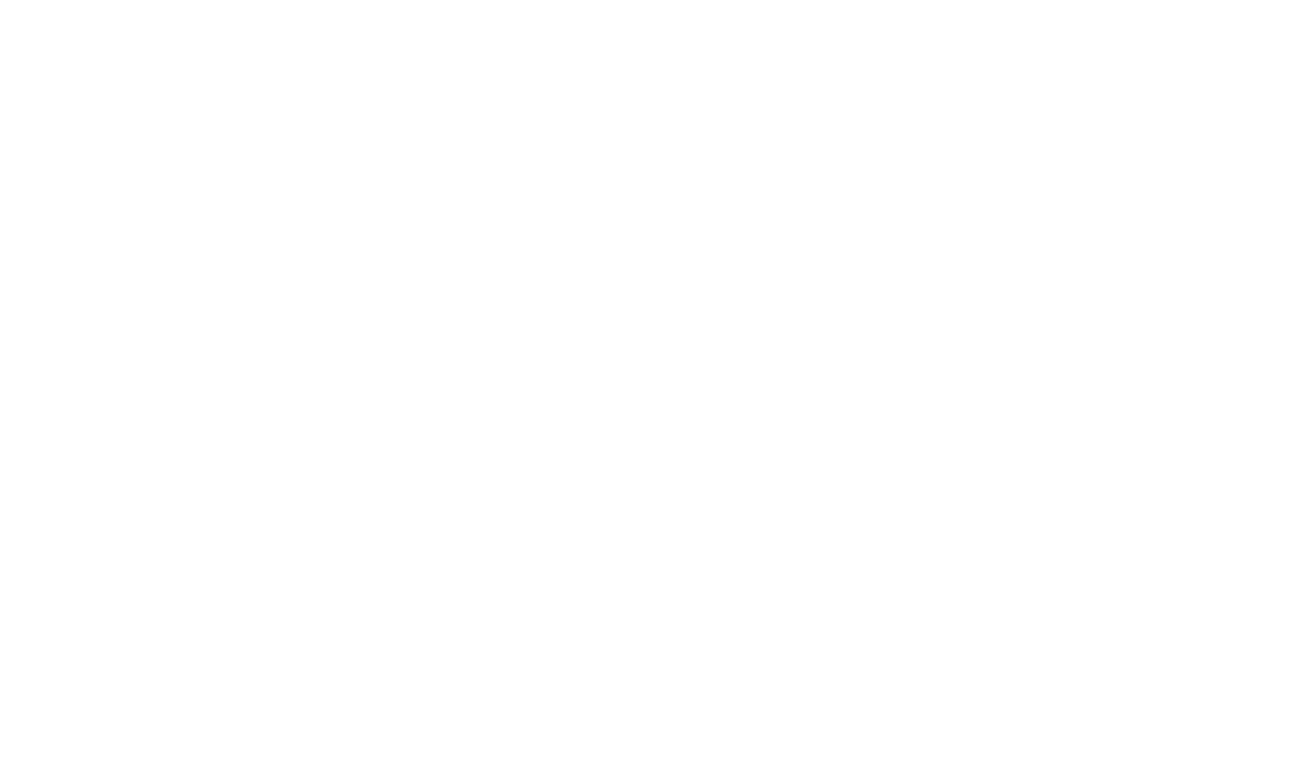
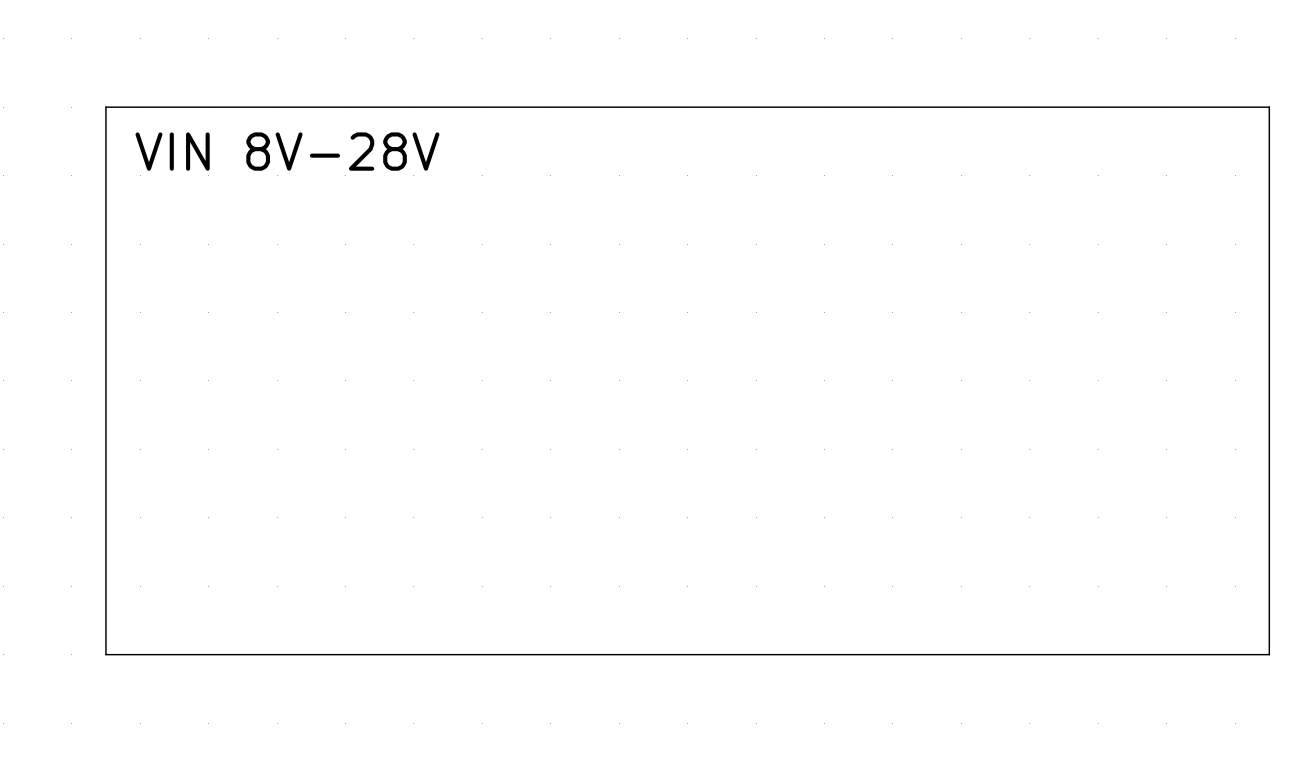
line: none -> (105, 107) (1269, 107) (1269, 654) (105, 654) (105, 107)
text: none -> VIN 8V-28V (287, 151)

